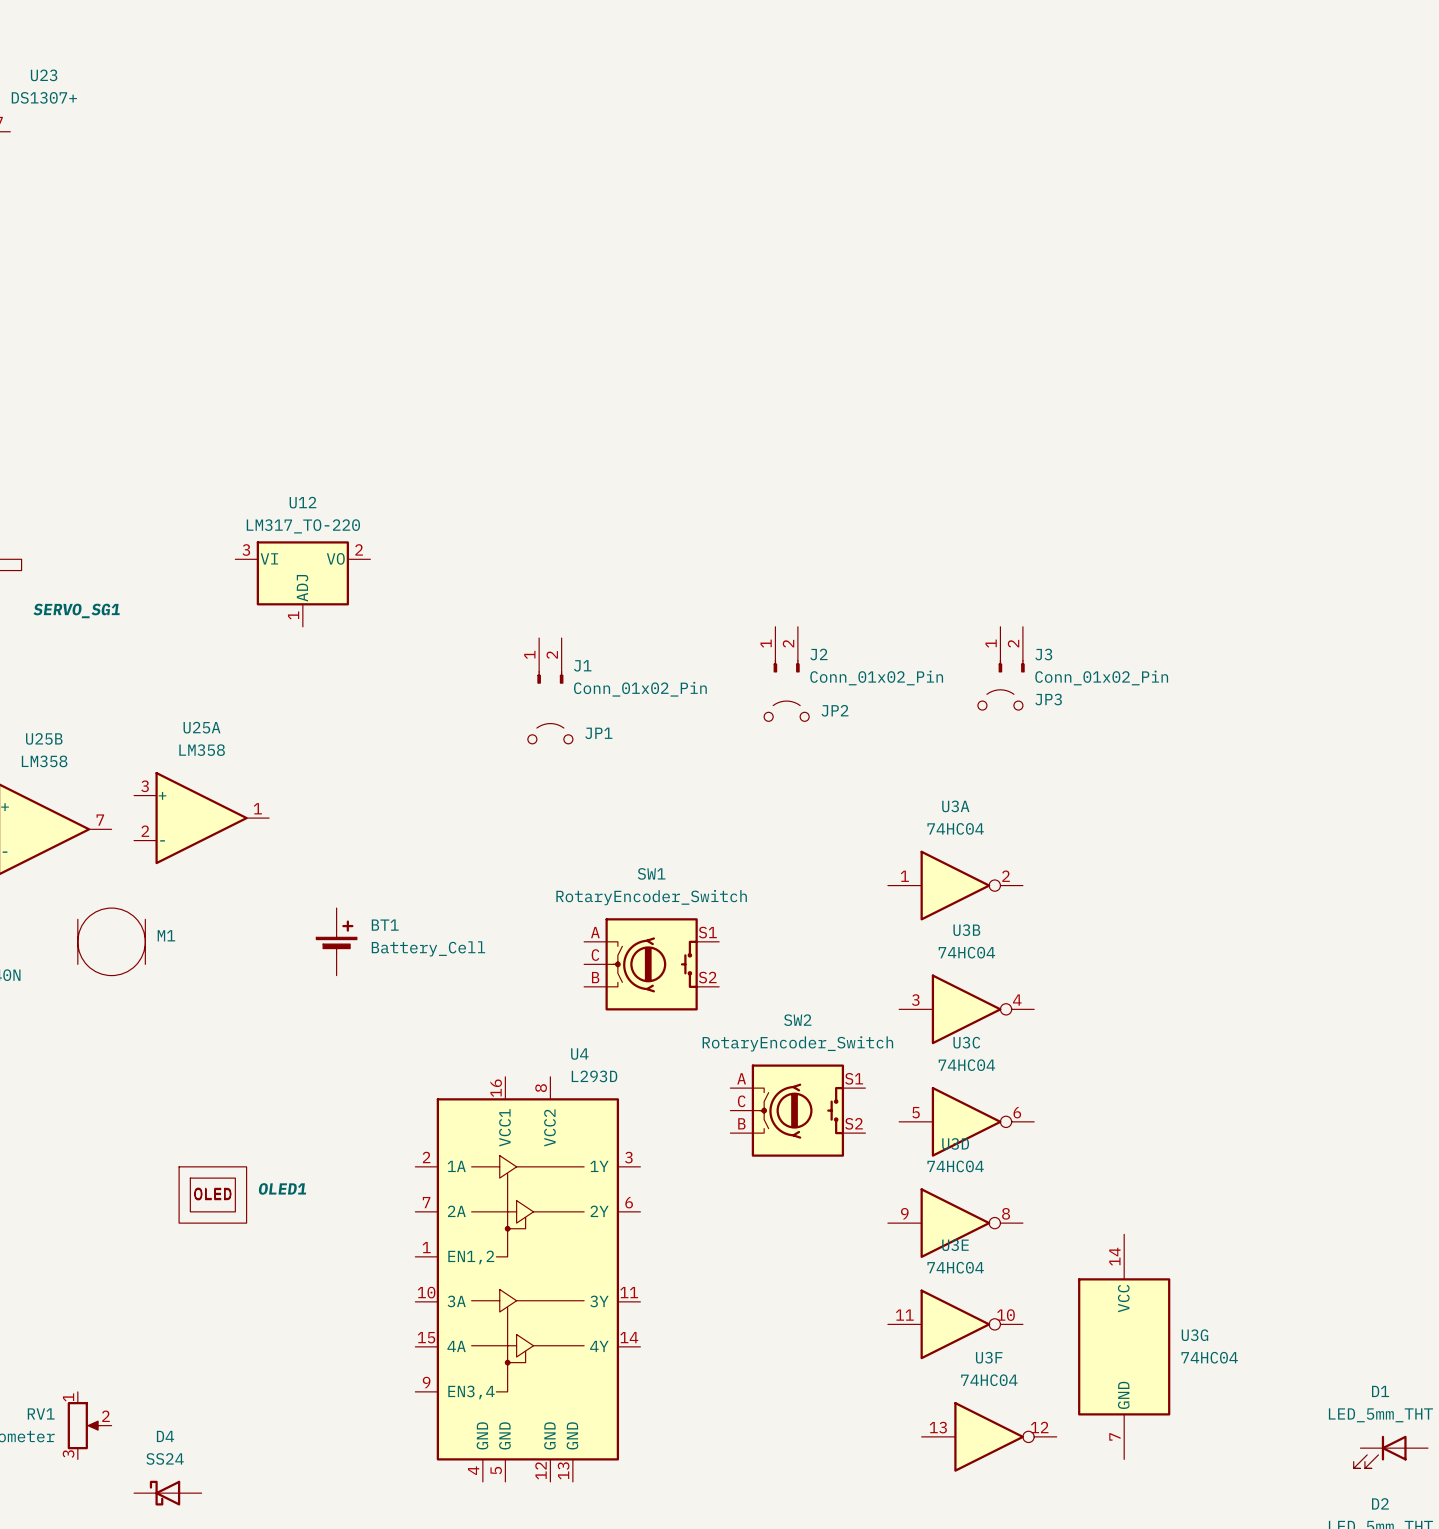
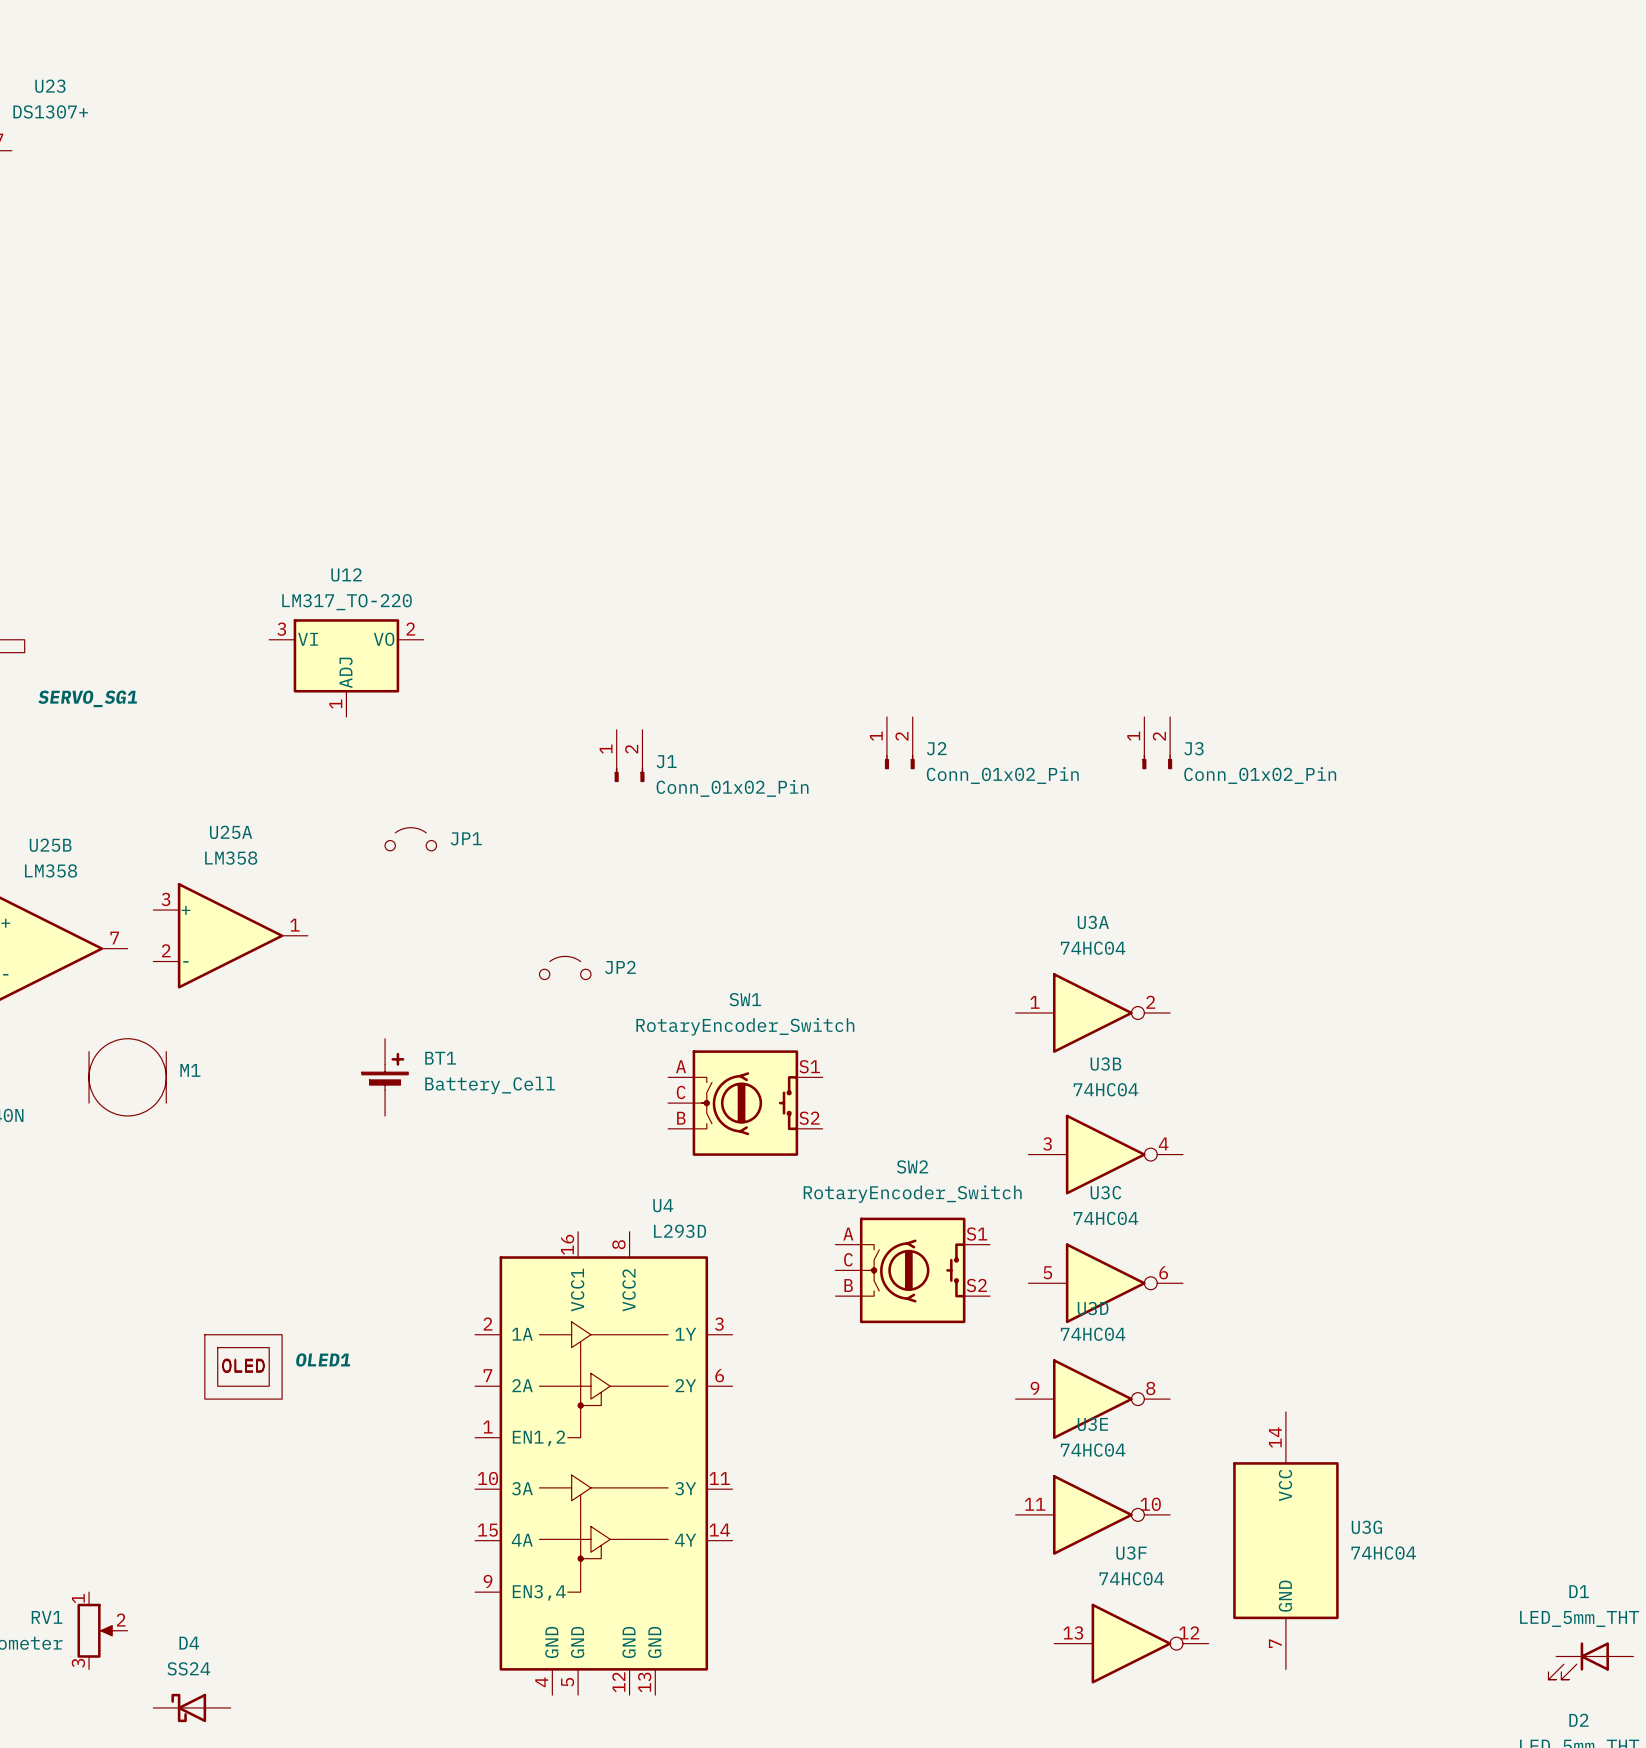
JP3: (1000, 699) -> none
JP2 position: (786, 711) -> (565, 967)
JP1 position: (550, 733) -> (410, 839)

